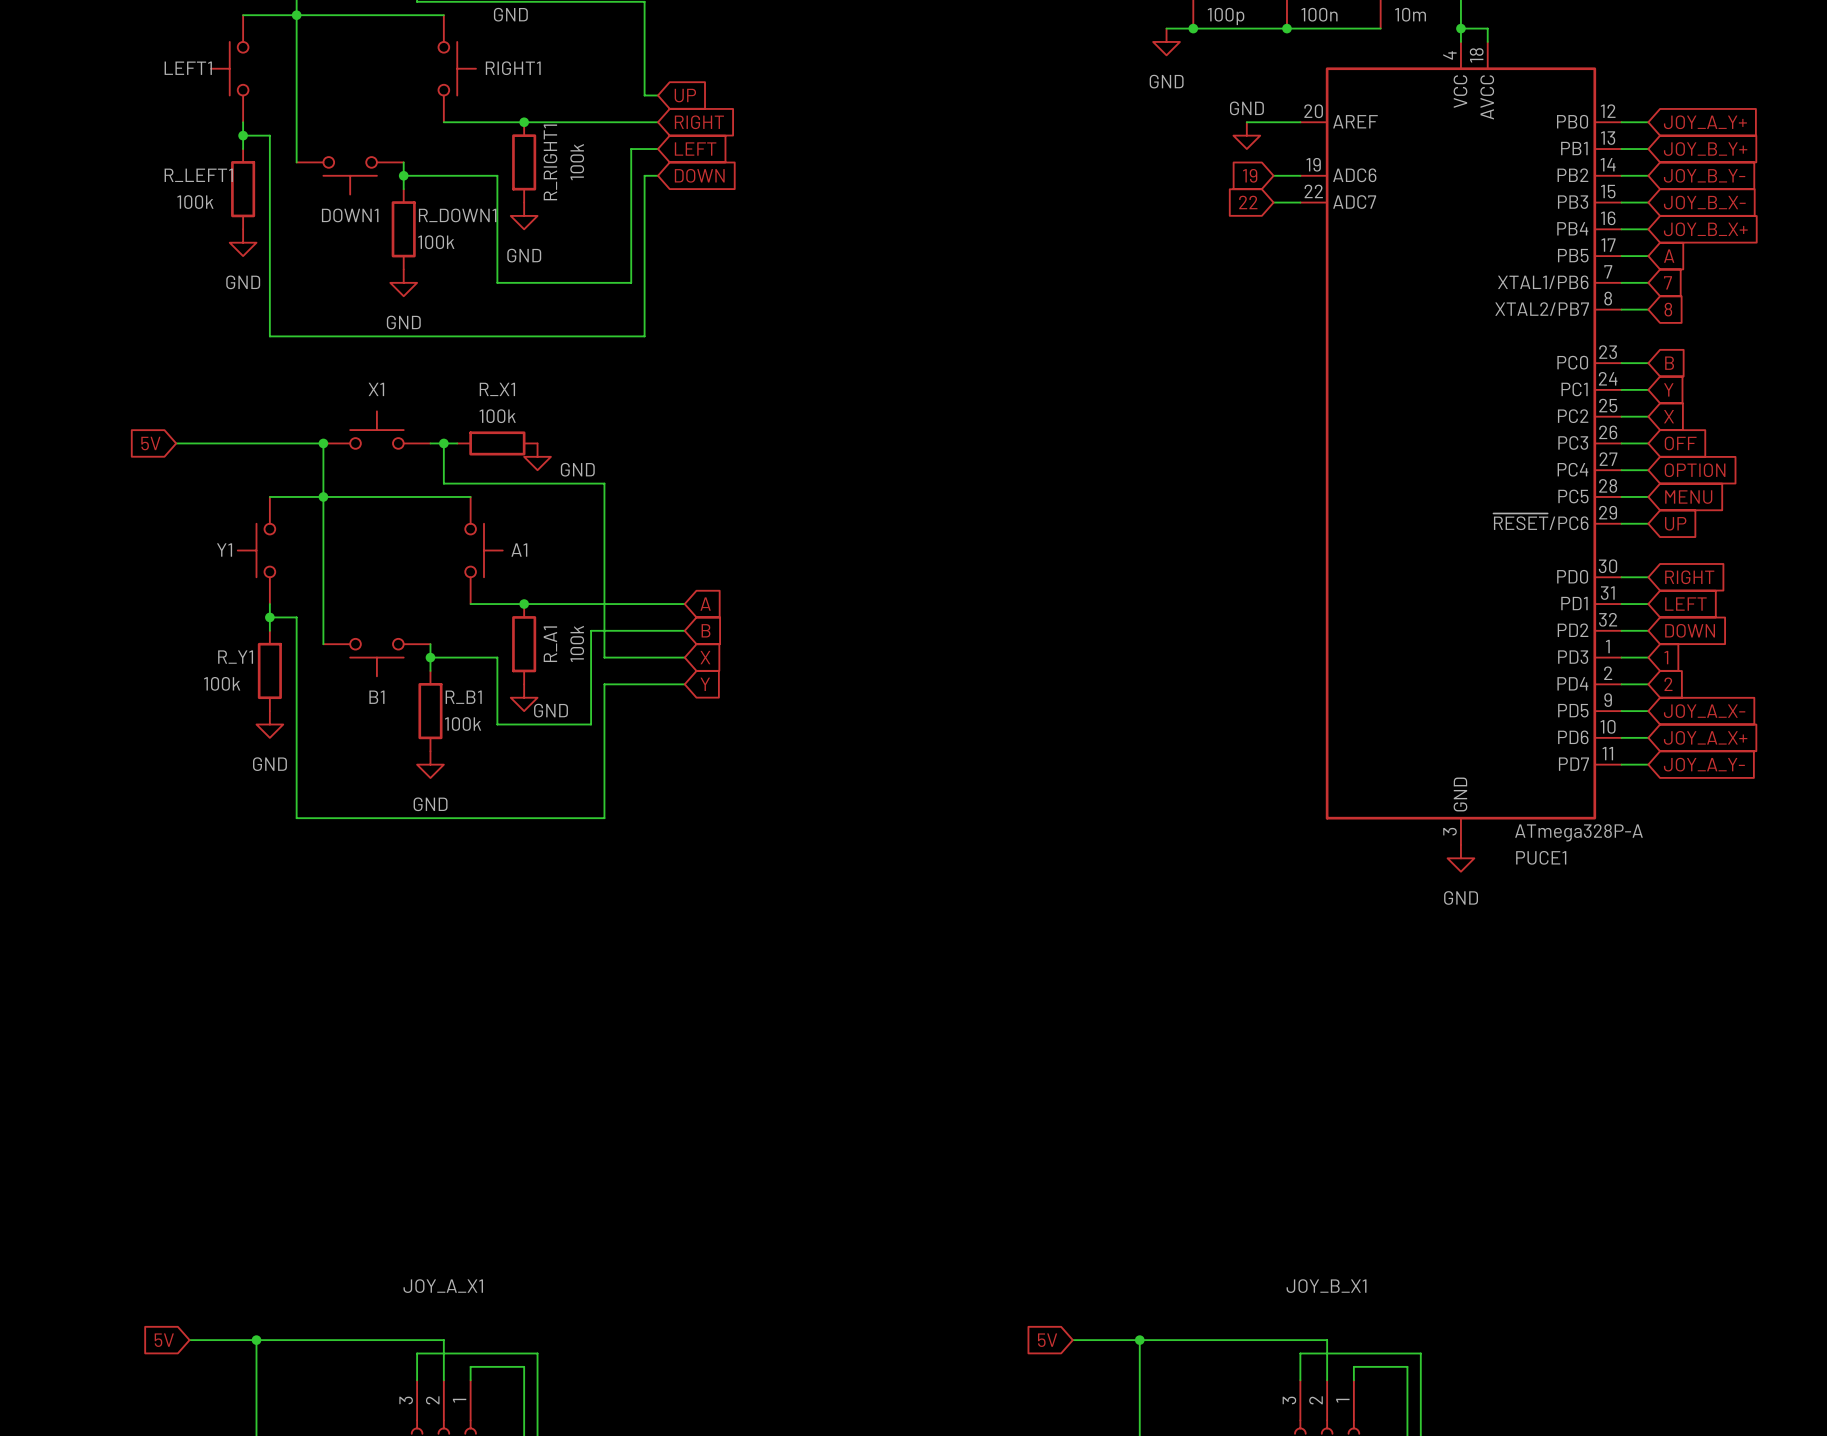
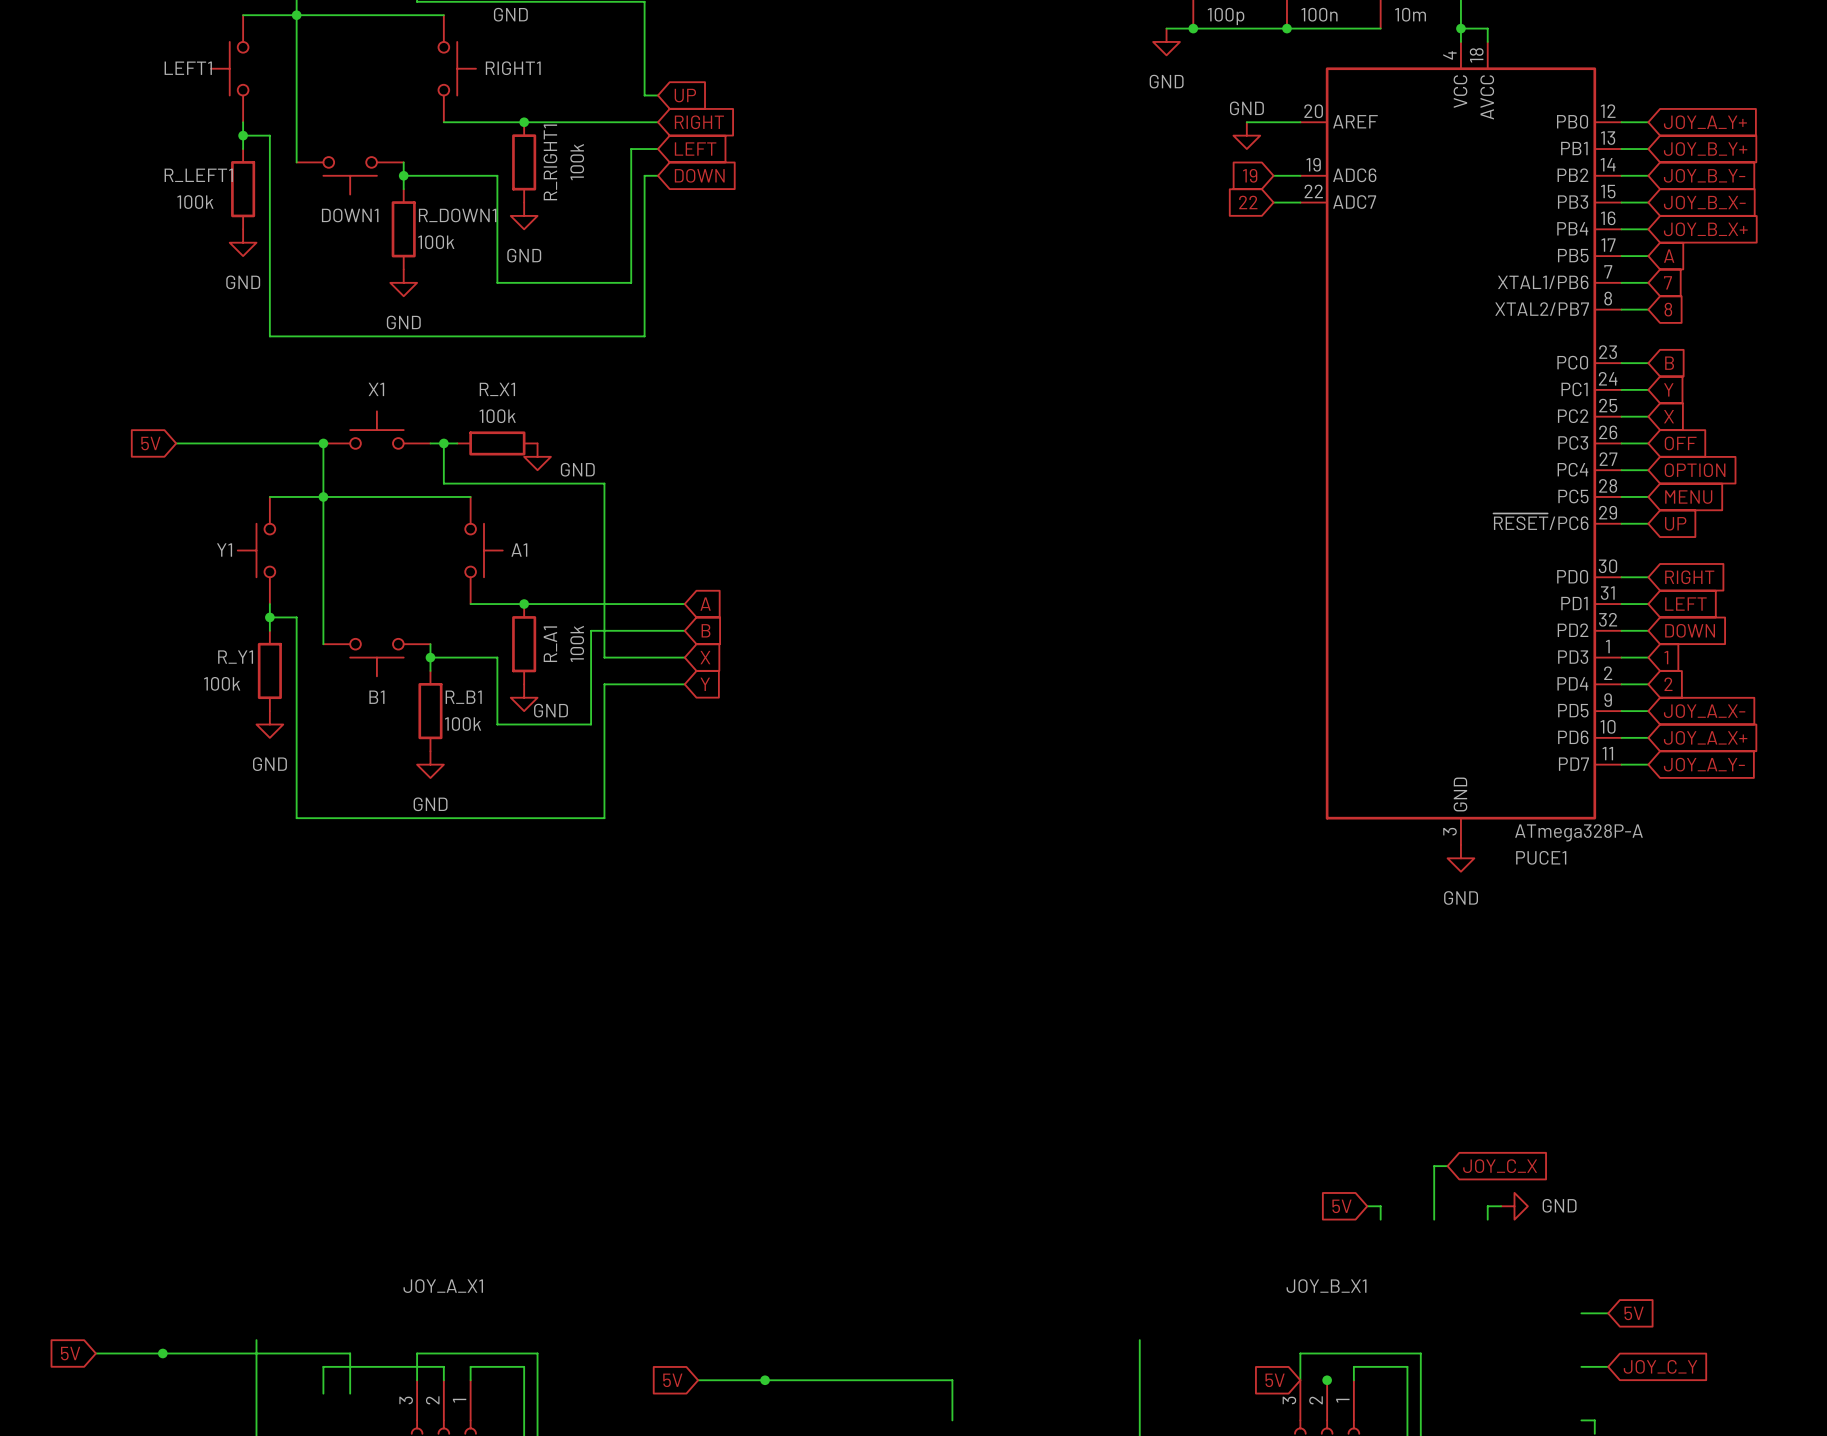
wire: none -> (1447, 1166) (1434, 1166) (1434, 1219)
global label: none -> JOY_C_X (1500, 1166)
global label: none -> 5V (1341, 1206)
wire: none -> (1367, 1206) (1380, 1206) (1380, 1219)
wire: none -> (1501, 1206) (1487, 1206) (1487, 1219)
power symbol: none -> GND (1514, 1206)
wire: none -> (1581, 1313) (1608, 1313)
global label: none -> 5V (1634, 1313)
global label position: 5V (164, 1340) -> 5V (70, 1353)
wire: (189, 1340) (443, 1340) (443, 1366) -> (323, 1393) (323, 1366) (443, 1366)
junction: (256, 1340) -> none
global label: 5V (1047, 1340) -> none
wire: (1072, 1340) (1327, 1340) (1327, 1380) -> none
junction: (1139, 1340) -> none
wire: none -> (95, 1353) (350, 1353) (350, 1393)
junction: none -> (162, 1353)
wire: none -> (1581, 1366) (1608, 1366)
global label: none -> JOY_C_Y (1660, 1366)
global label: none -> 5V (672, 1380)
wire: none -> (698, 1380) (952, 1380) (952, 1420)
junction: none -> (765, 1380)
global label: none -> 5V (1275, 1380)
junction: none -> (1327, 1380)
wire: none -> (1581, 1420) (1594, 1420) (1594, 1433)

